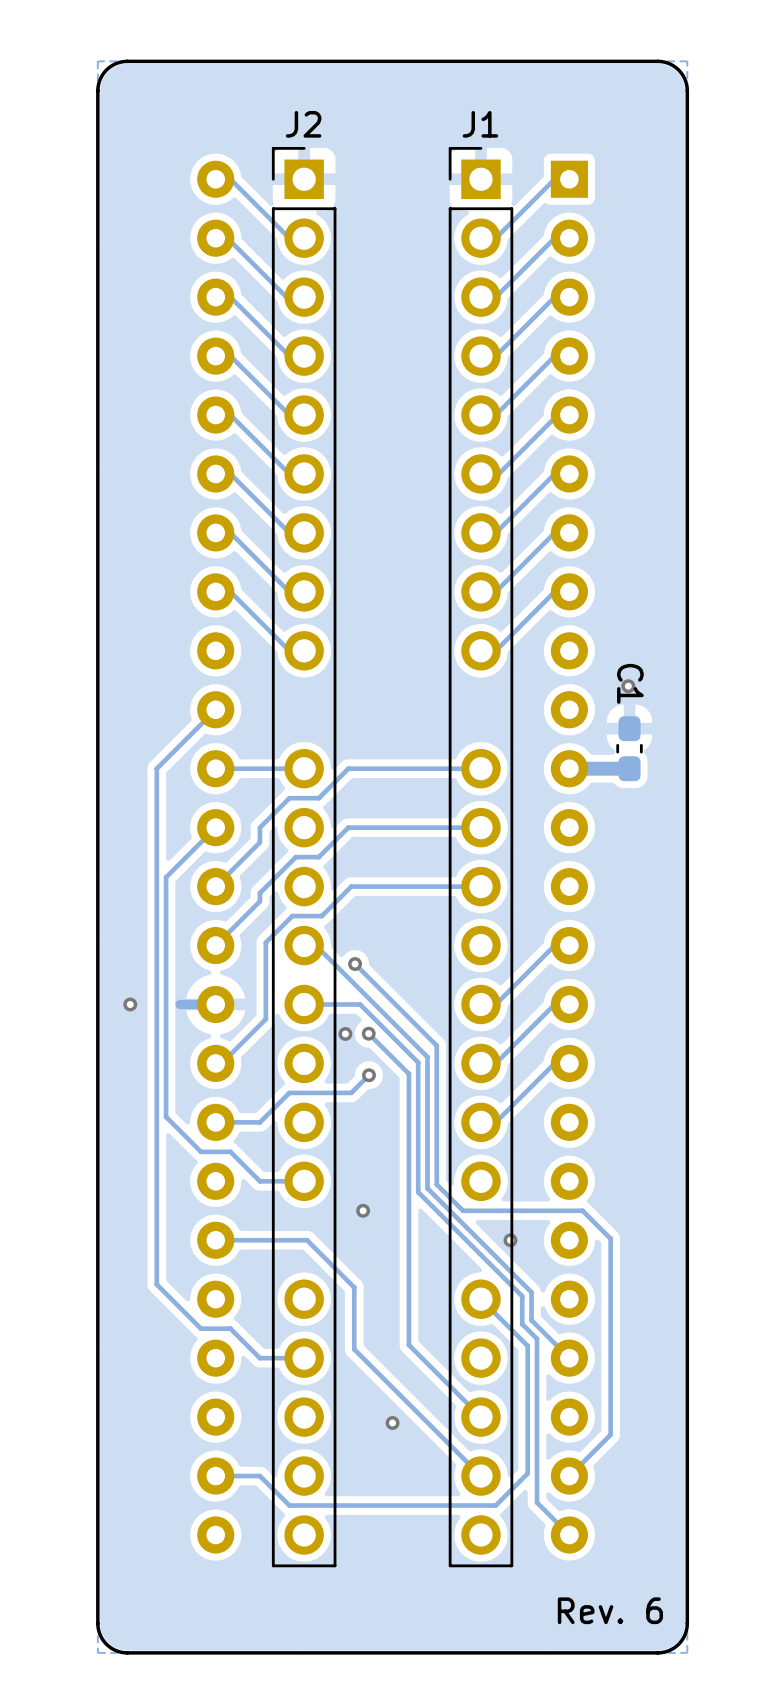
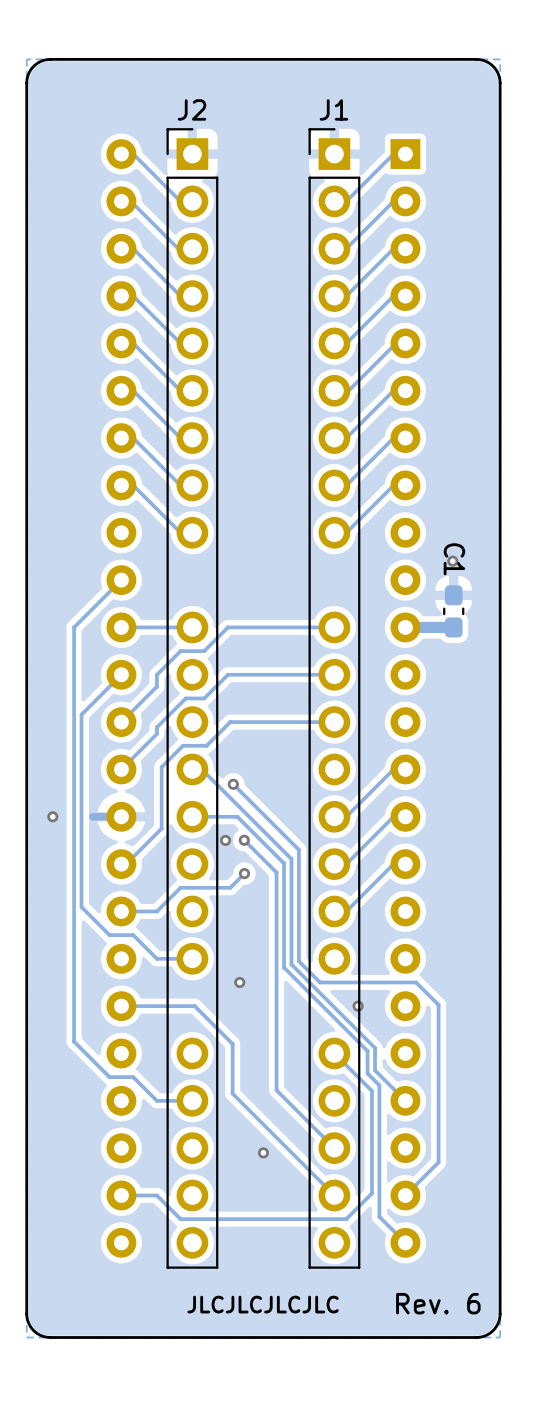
text: none -> JLCJLCJLCJLC (263, 1304)

